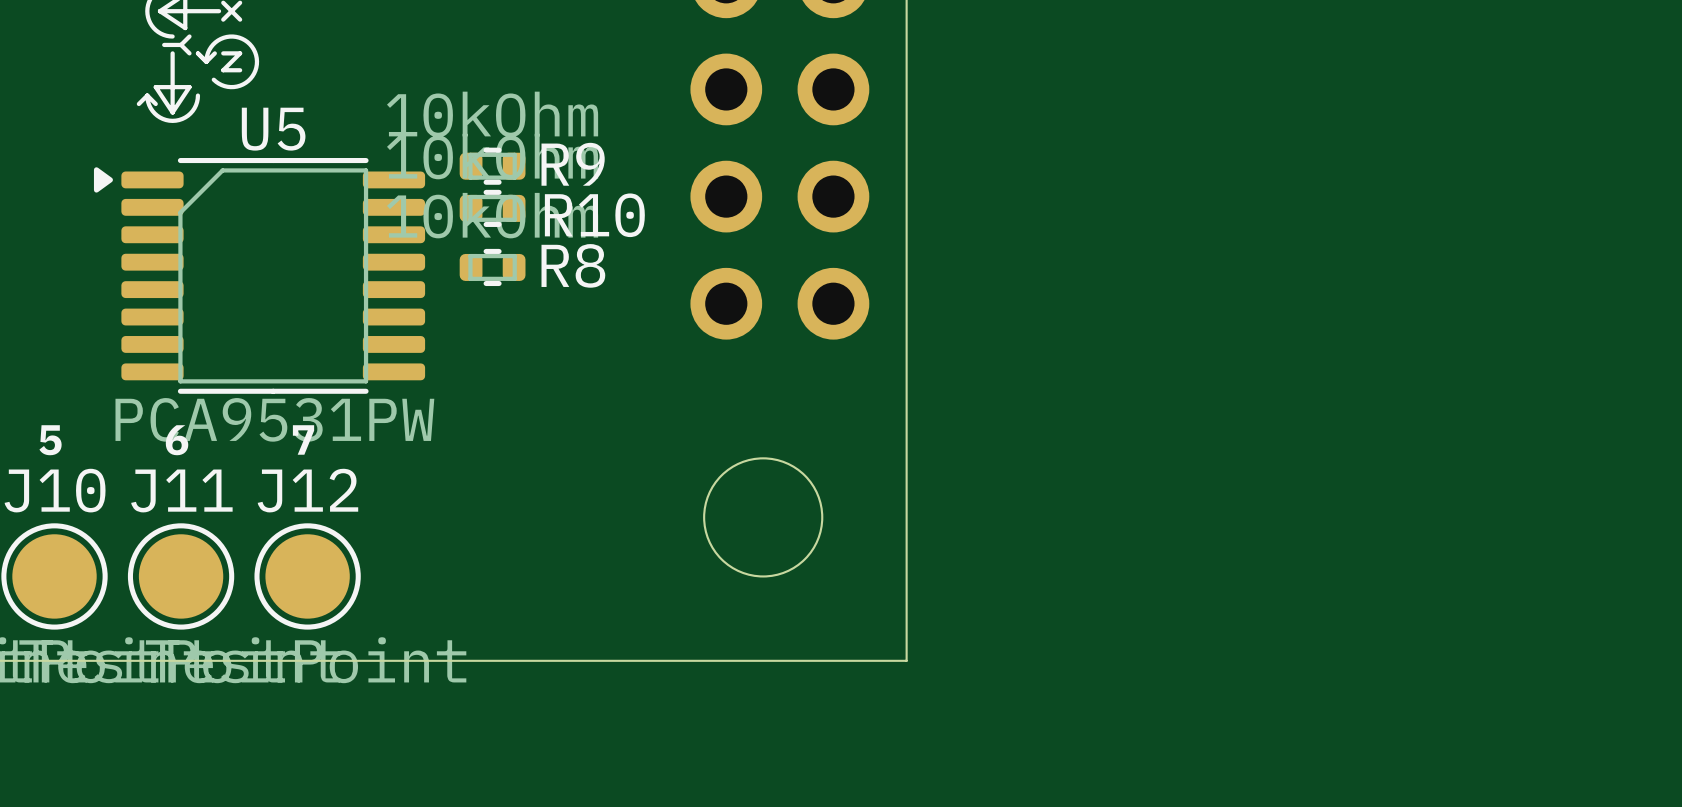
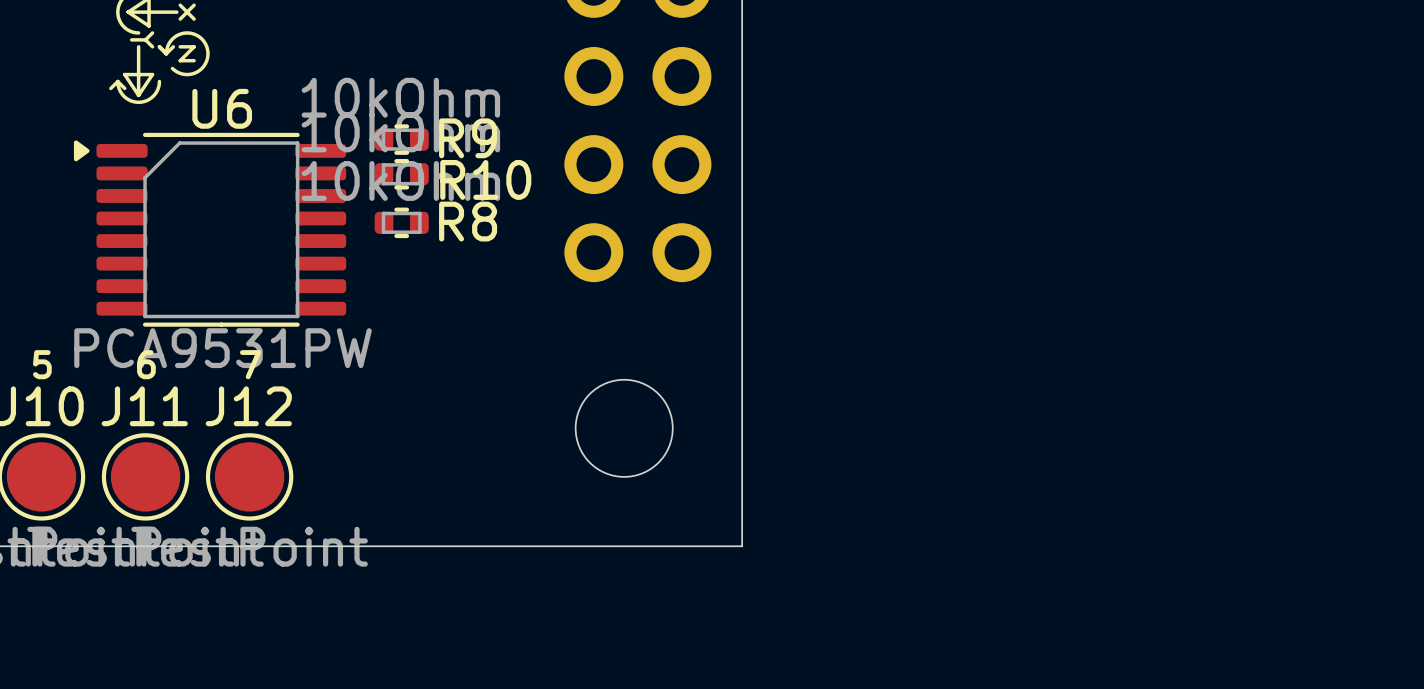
U5 name: U5 (273, 129) -> U6 (222, 108)

